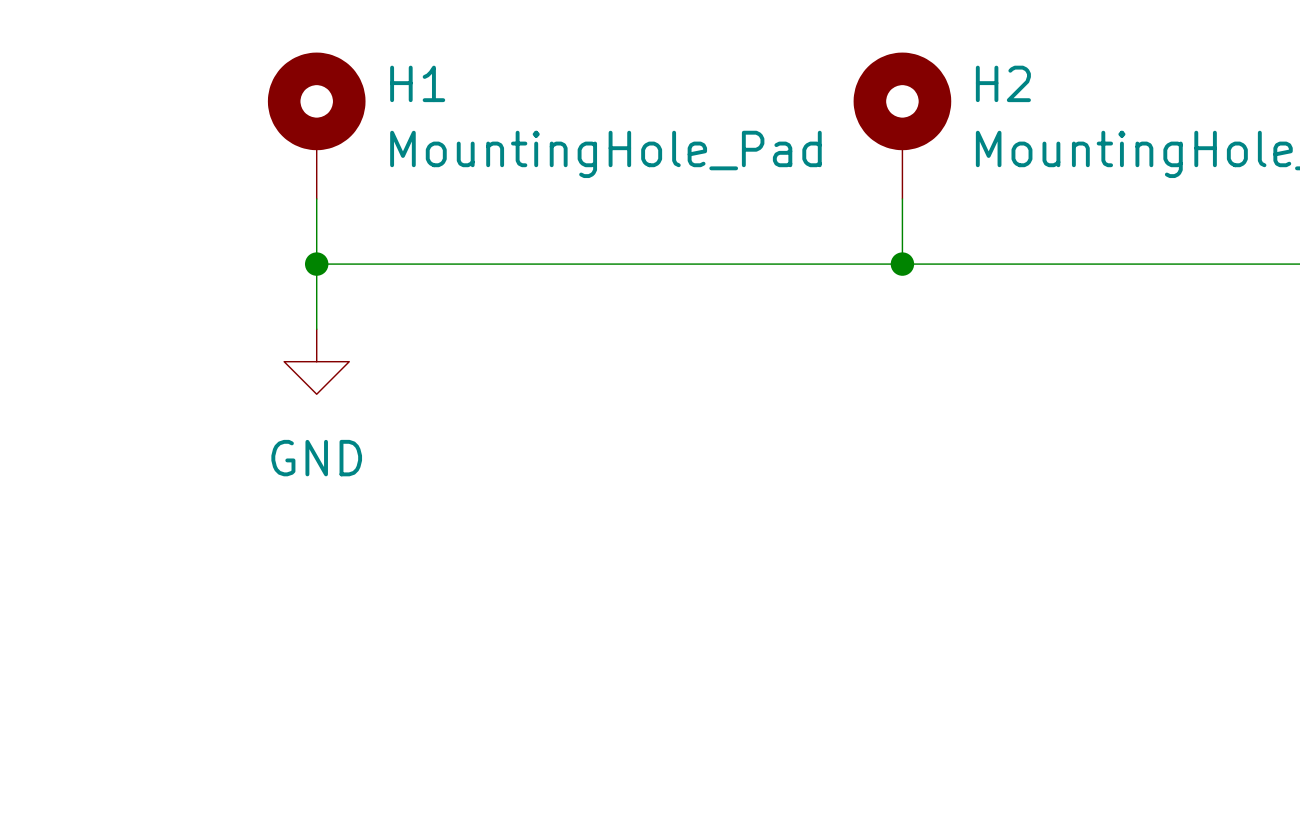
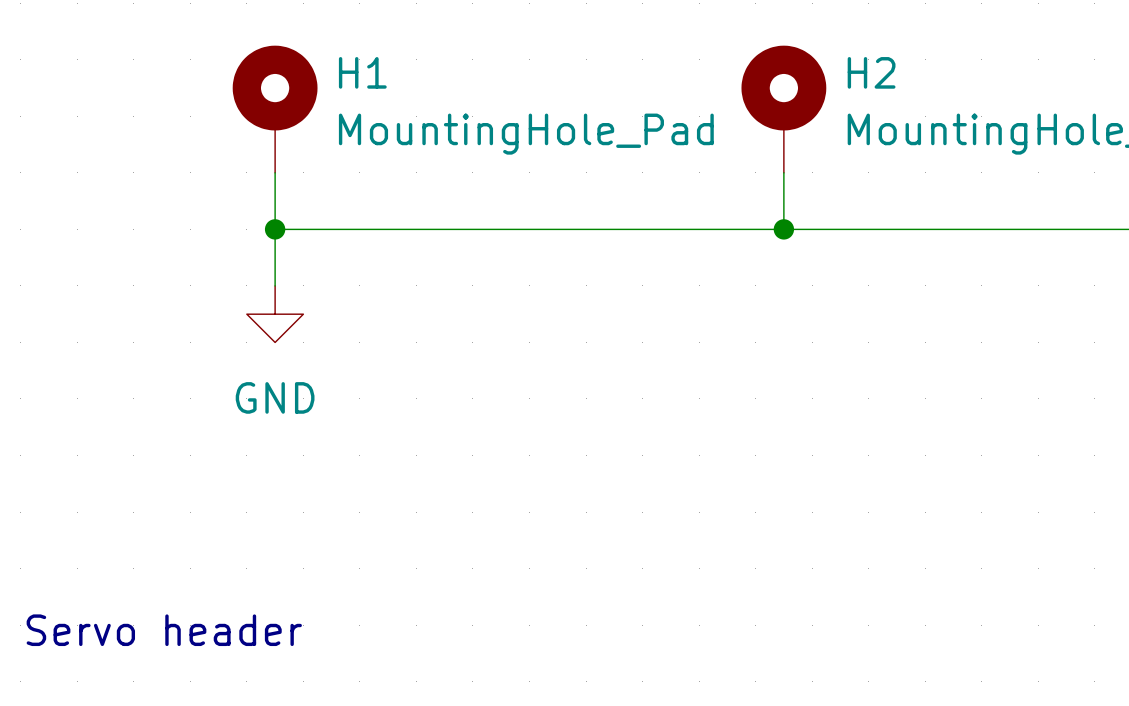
text: none -> Servo header (164, 630)

